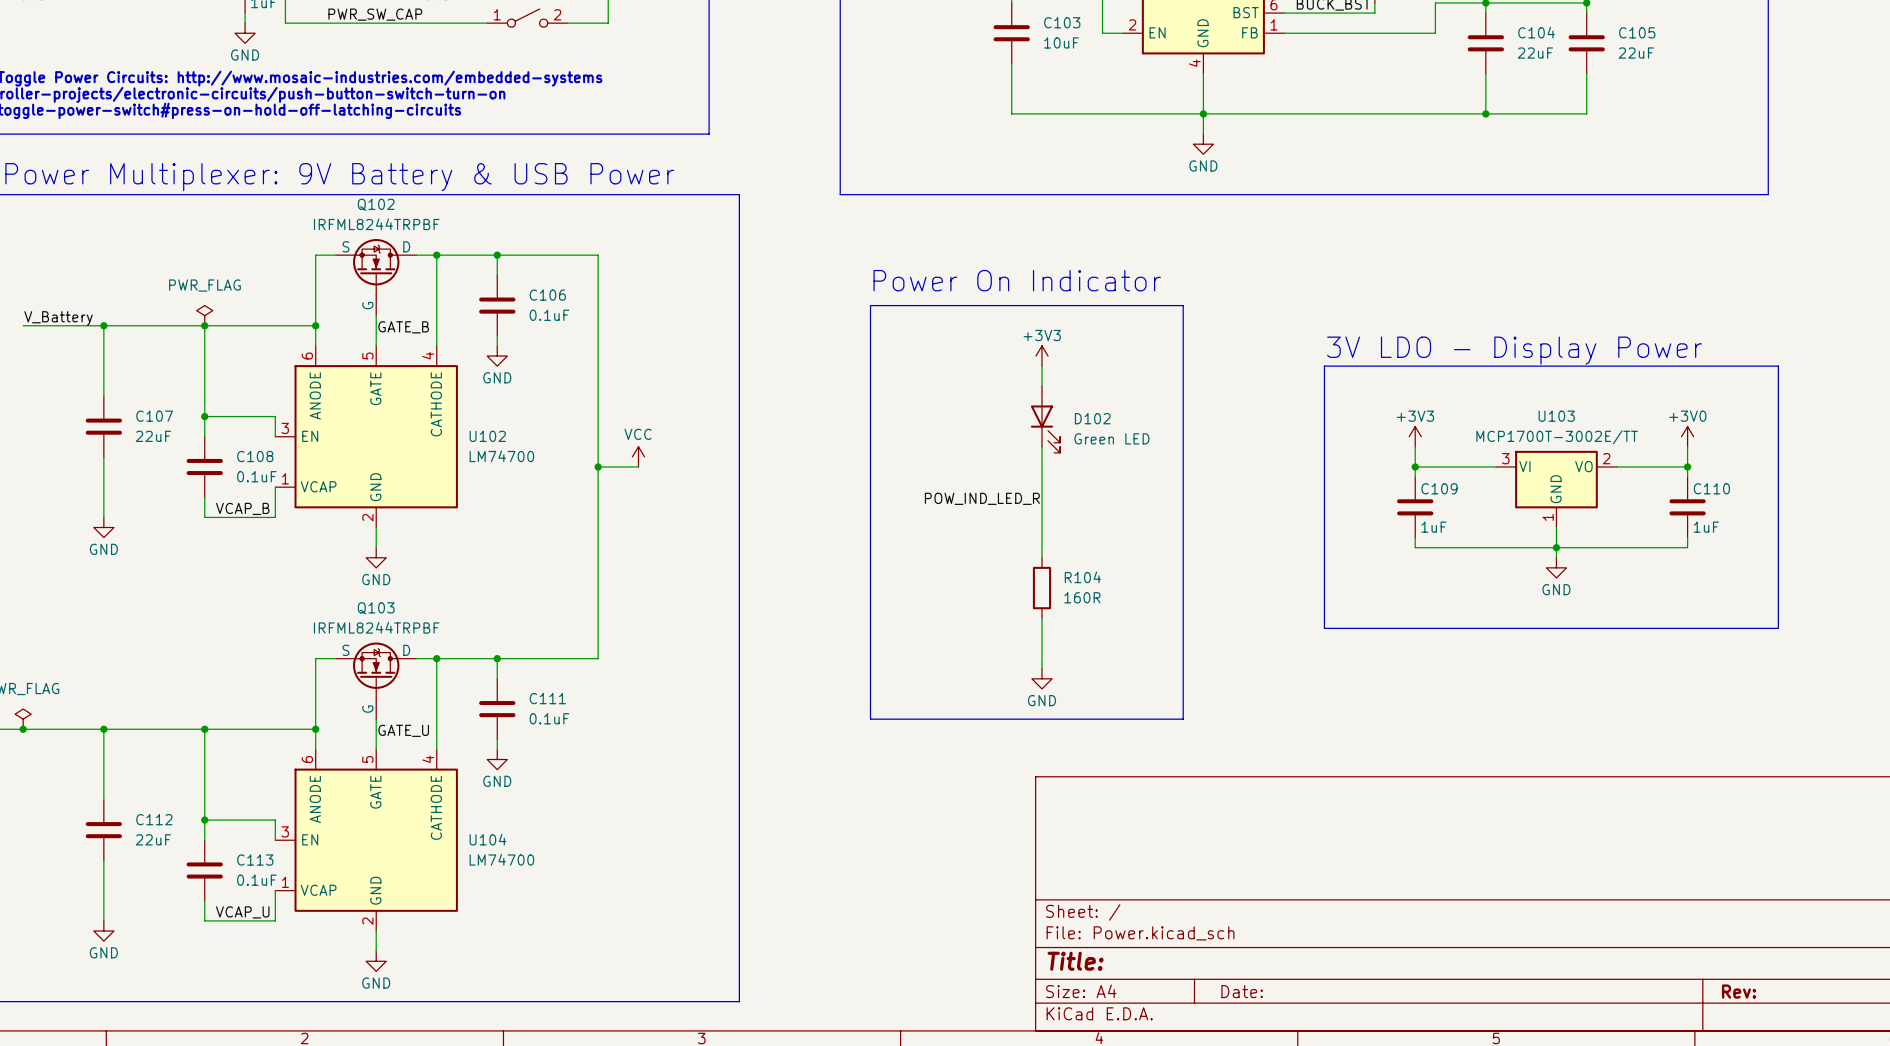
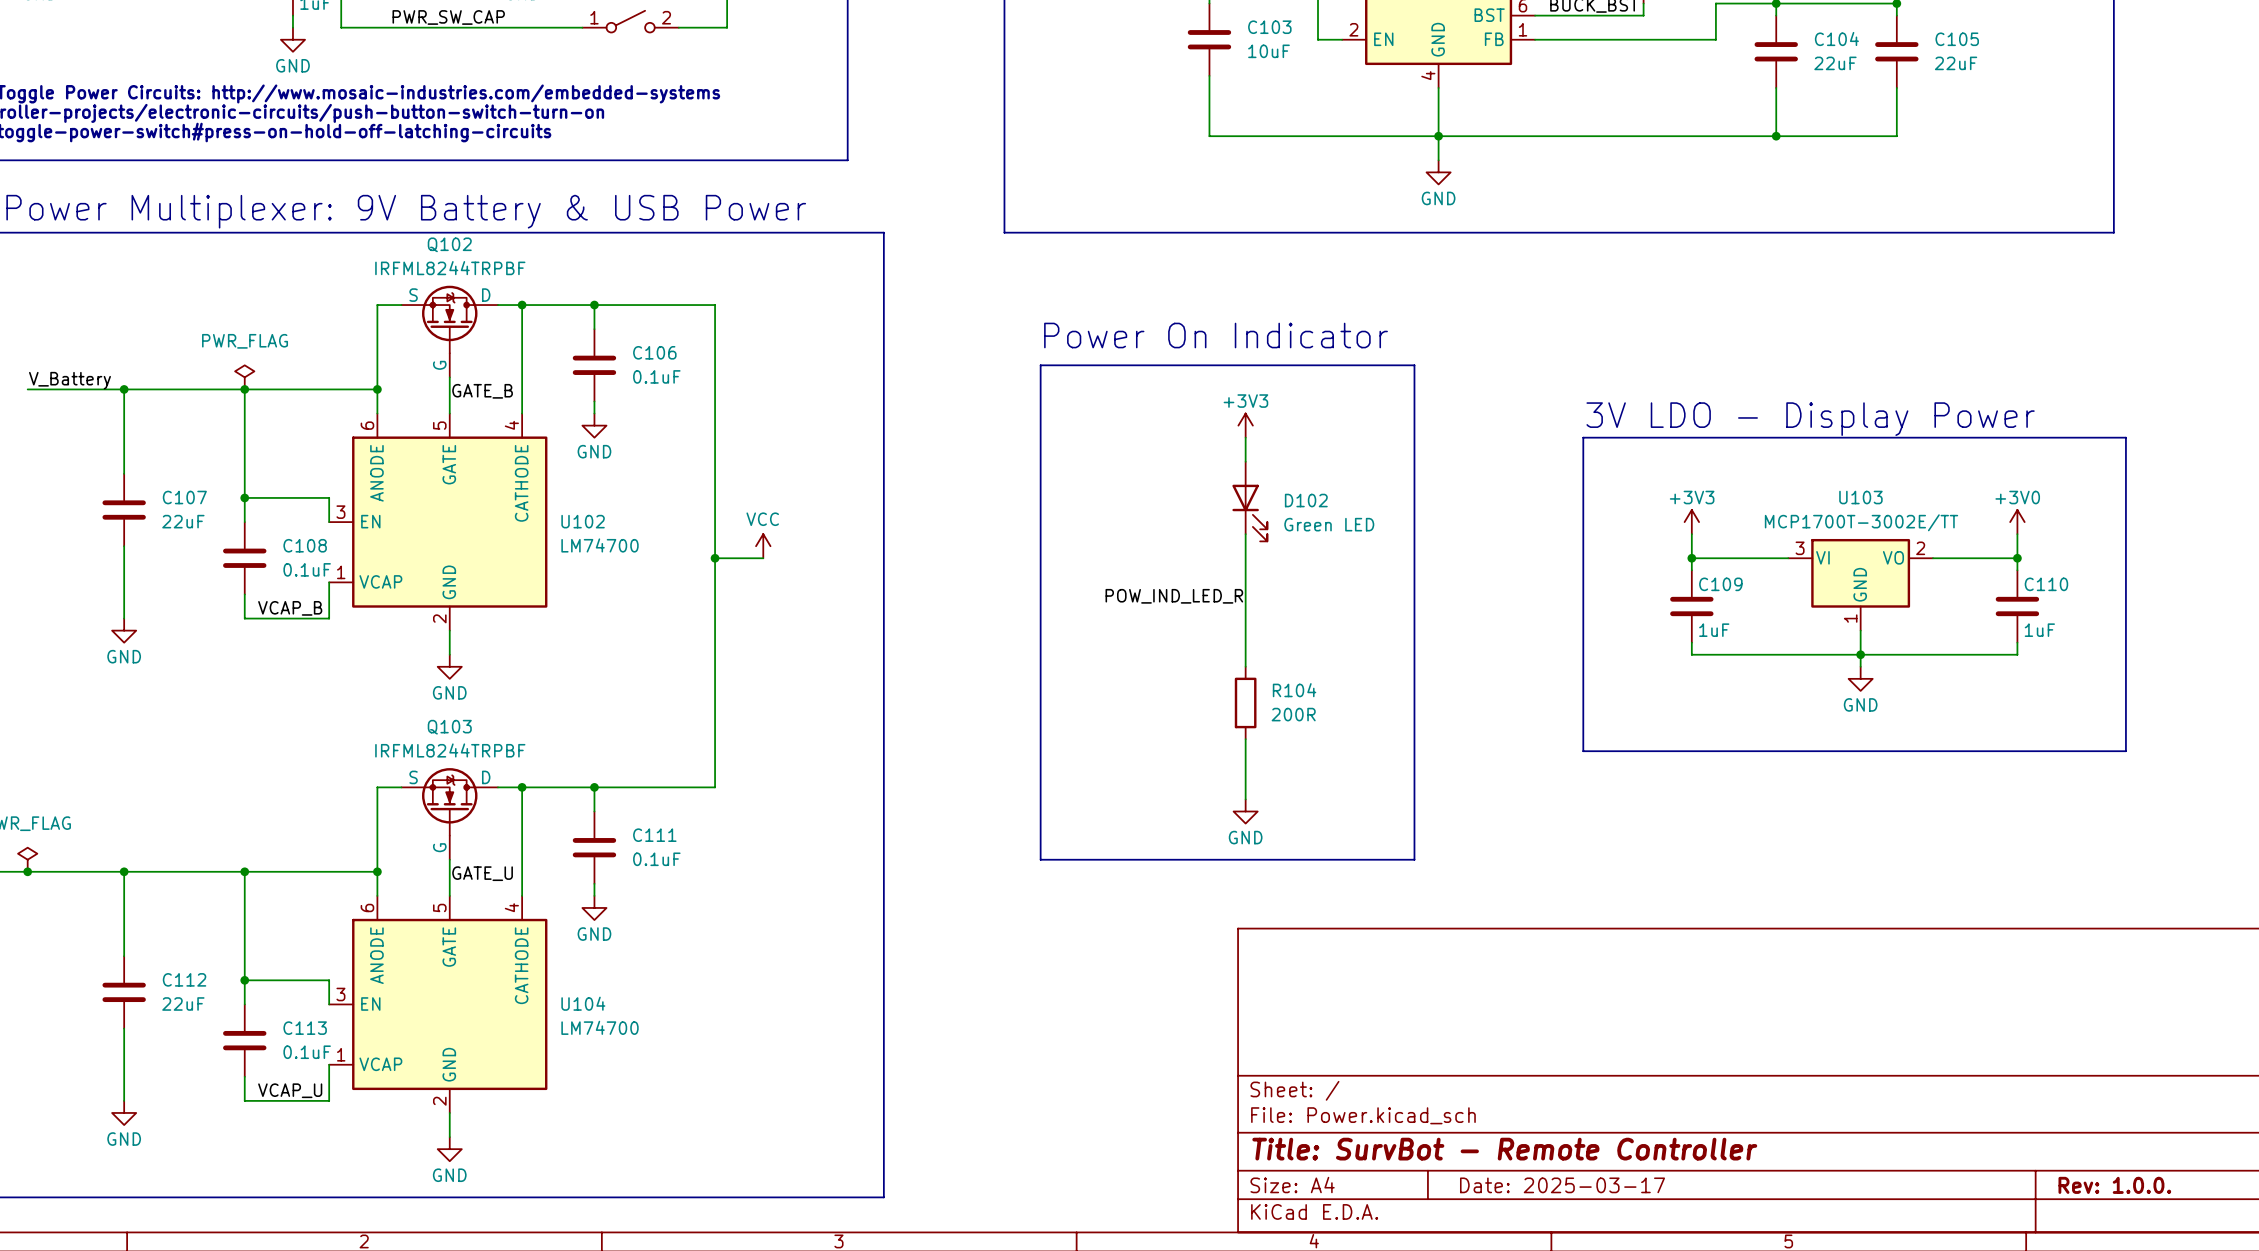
R104 value: 160R (1082, 597) -> 200R (1293, 714)
title block: Title: (1075, 961) -> Title: SurvBot - Remote Controller (1504, 1149)
title block: Date: (1242, 991) -> Date: 2025-03-17 (1562, 1185)
title block: Rev: (1739, 991) -> Rev: 1.0.0. (2114, 1185)

